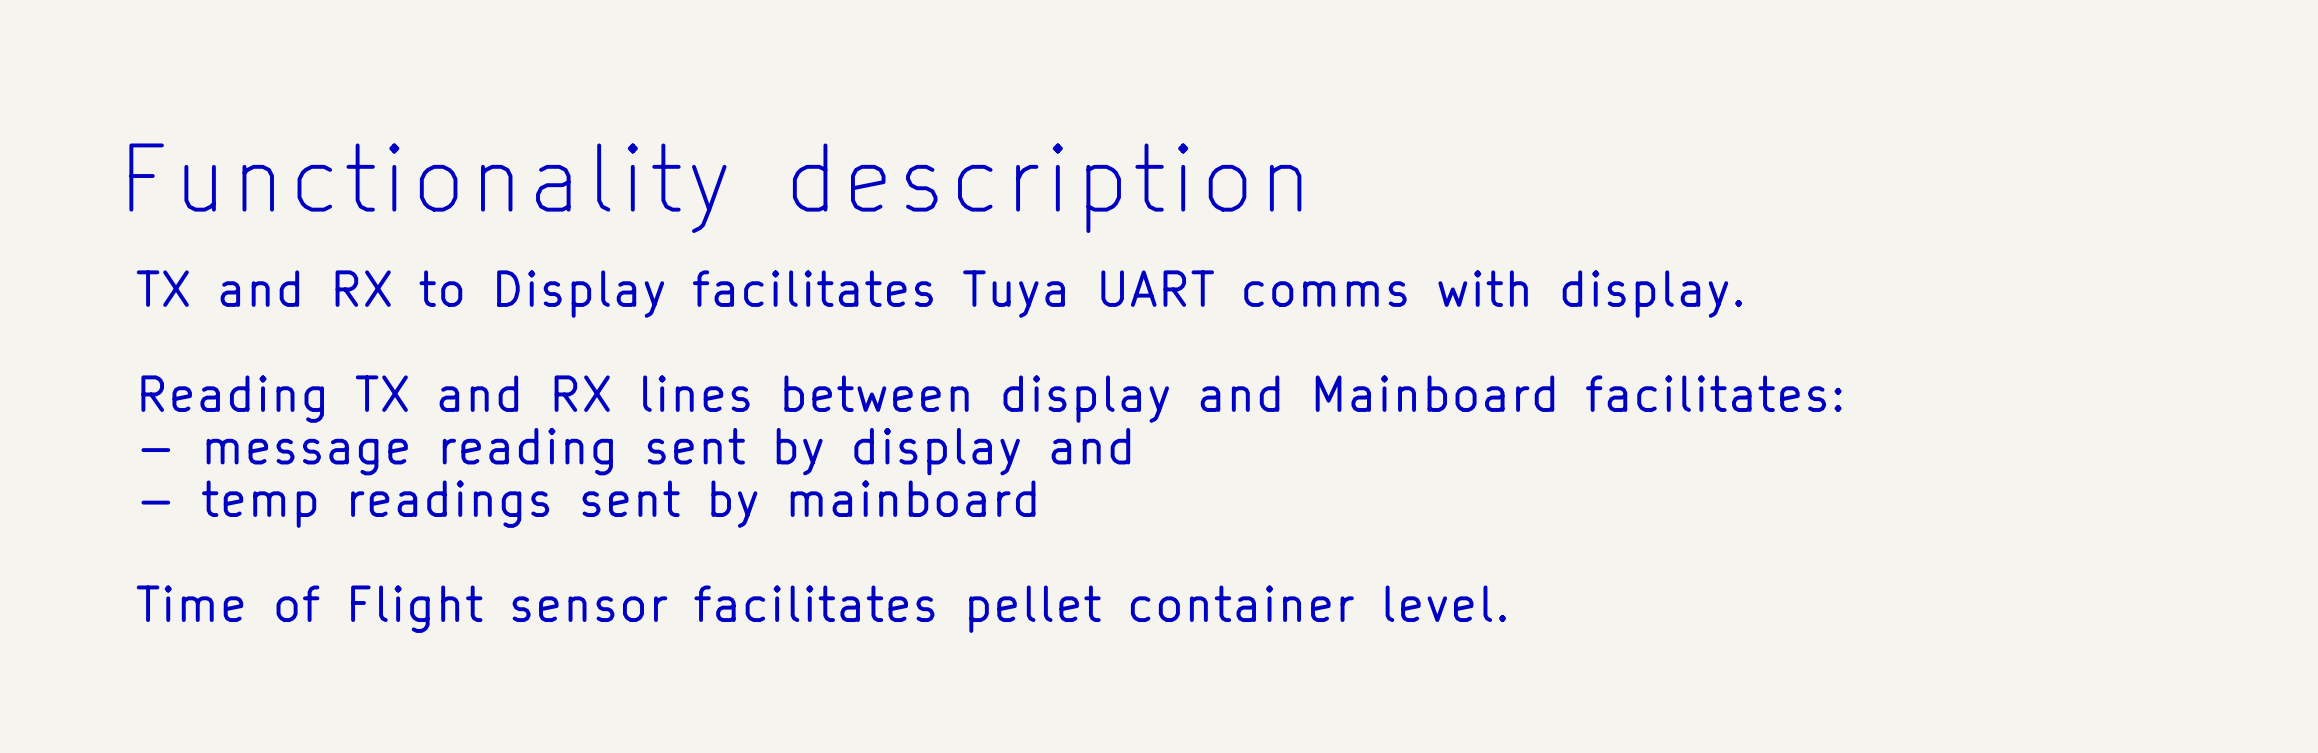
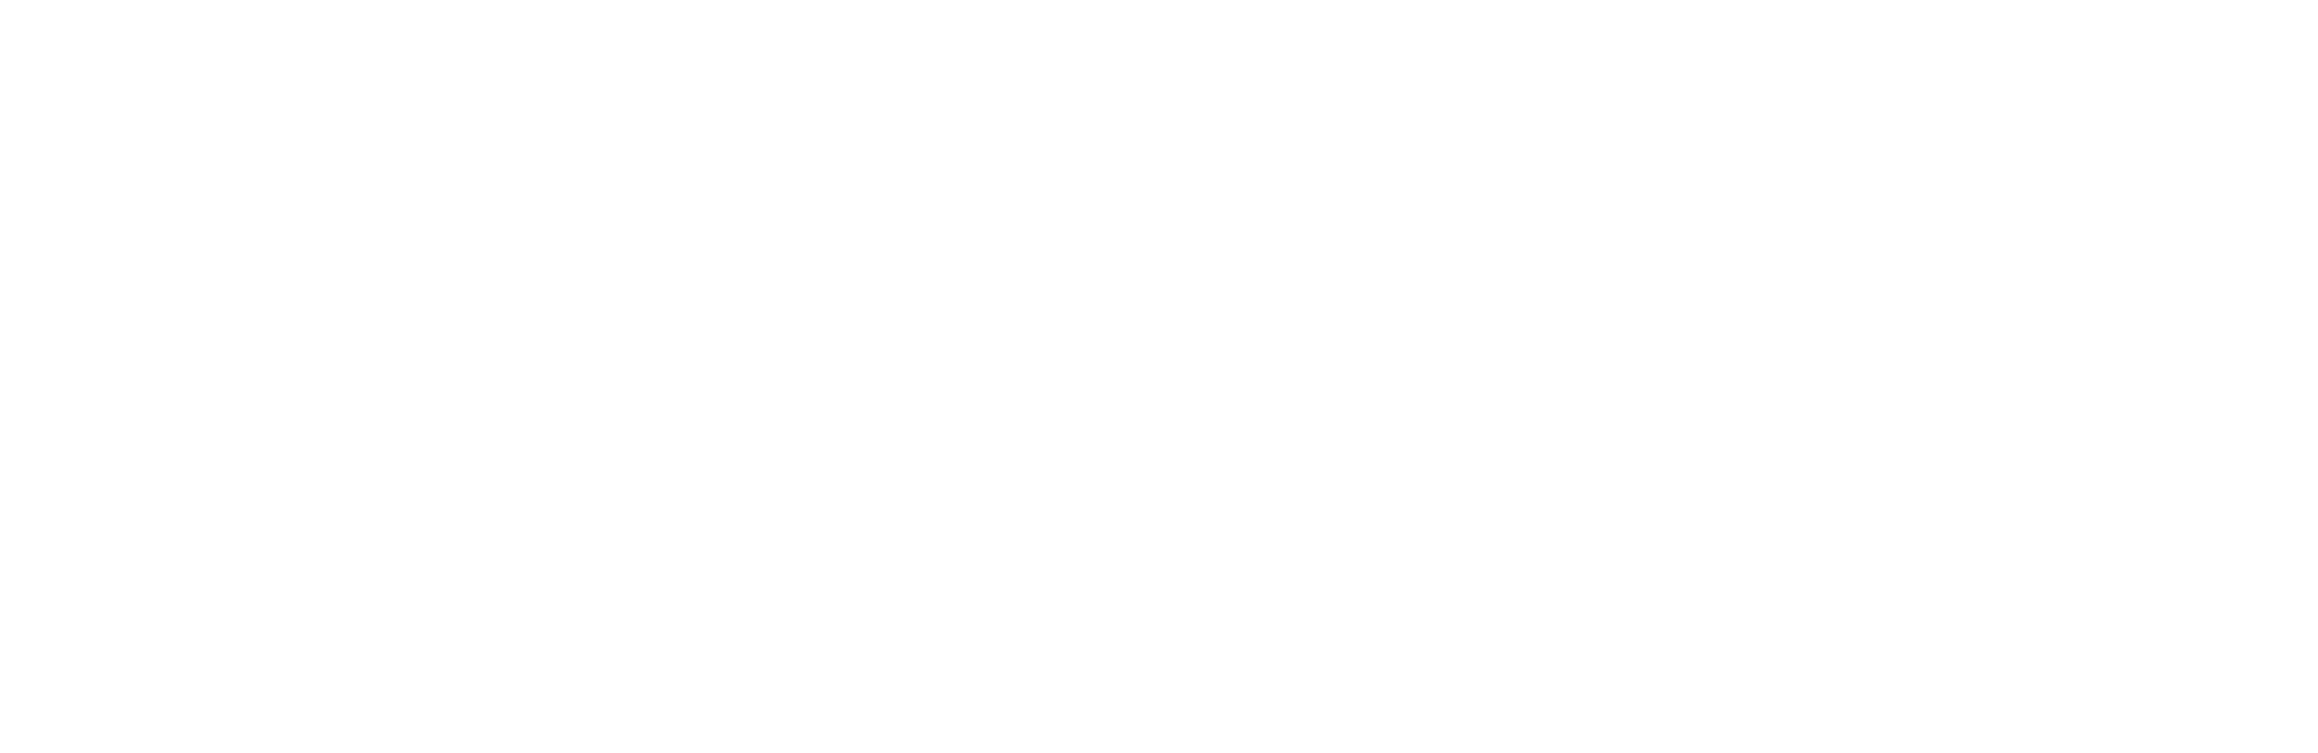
text: Functionality description (715, 188) -> none
text: TX and RX to Display facilitates Tuya UART comms with display. (939, 294) -> none
text: Reading TX and RX lines between display and Mainboard facilitates: (991, 399) -> none
text: - message reading sent by display and (635, 451) -> none
text: - temp readings sent by mainboard (588, 504) -> none
text: Time of Flight sensor facilitates pellet container level. (821, 609) -> none

